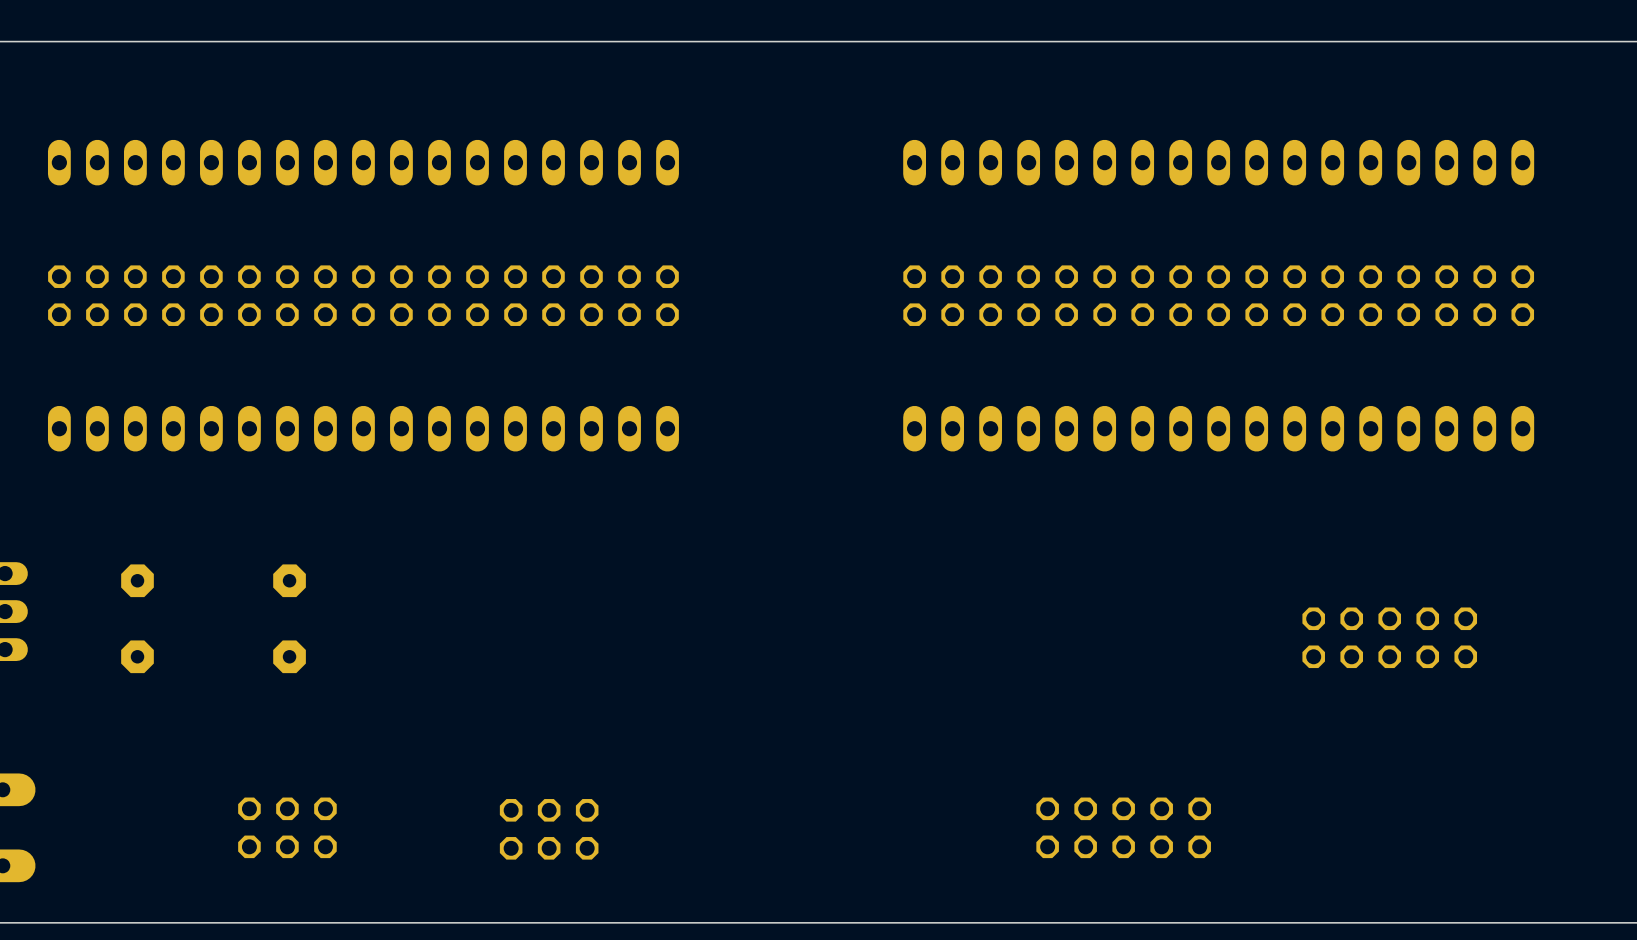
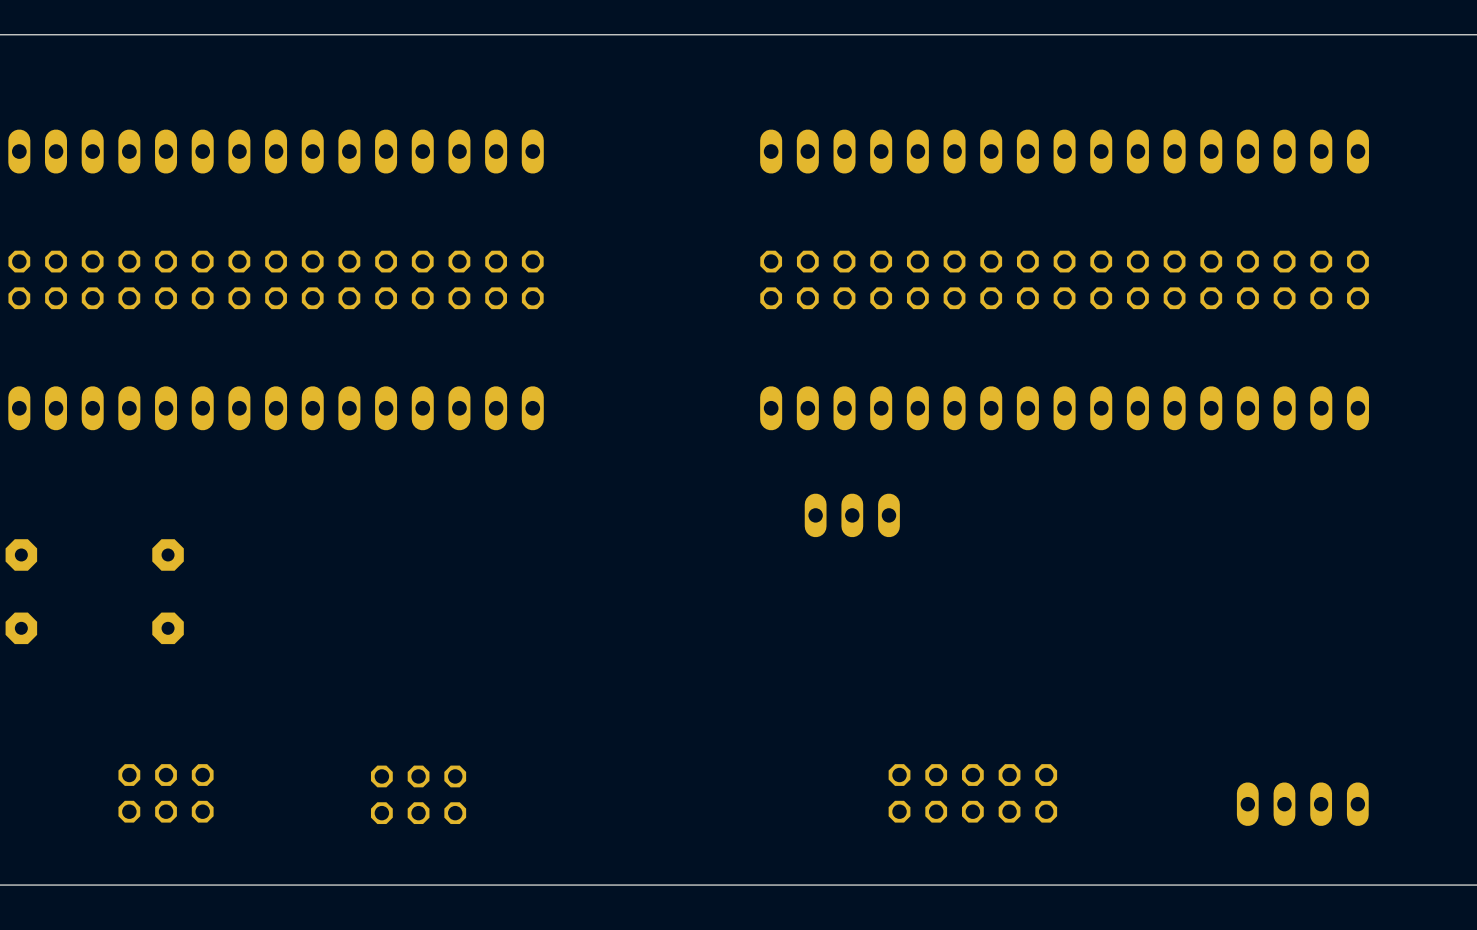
part: none -> (852, 515)
part: (1389, 637) -> none
part: none -> (1302, 804)

